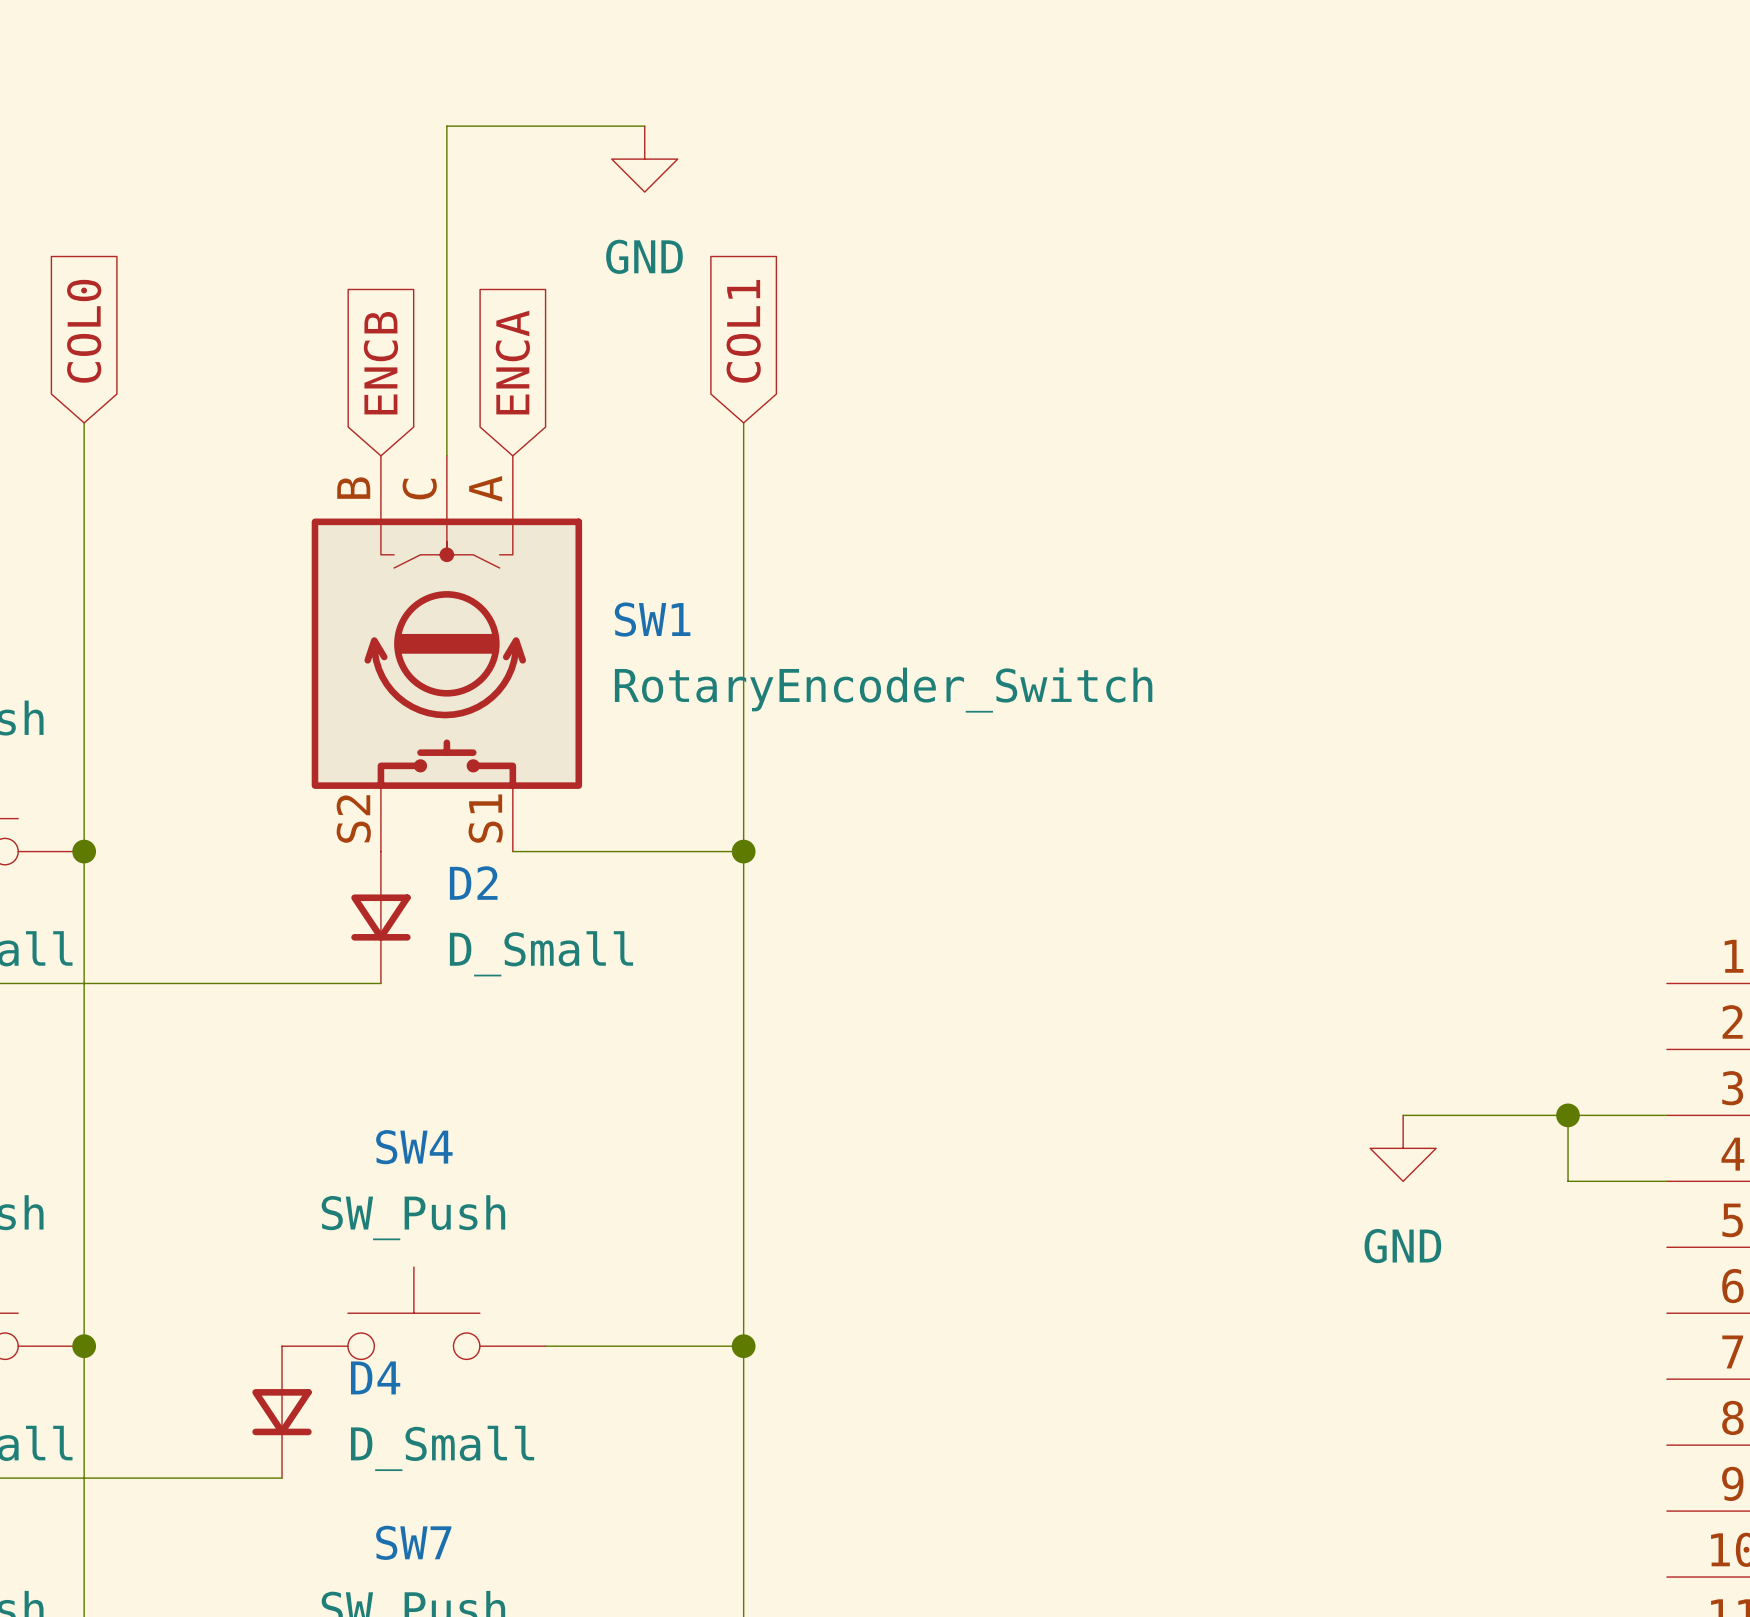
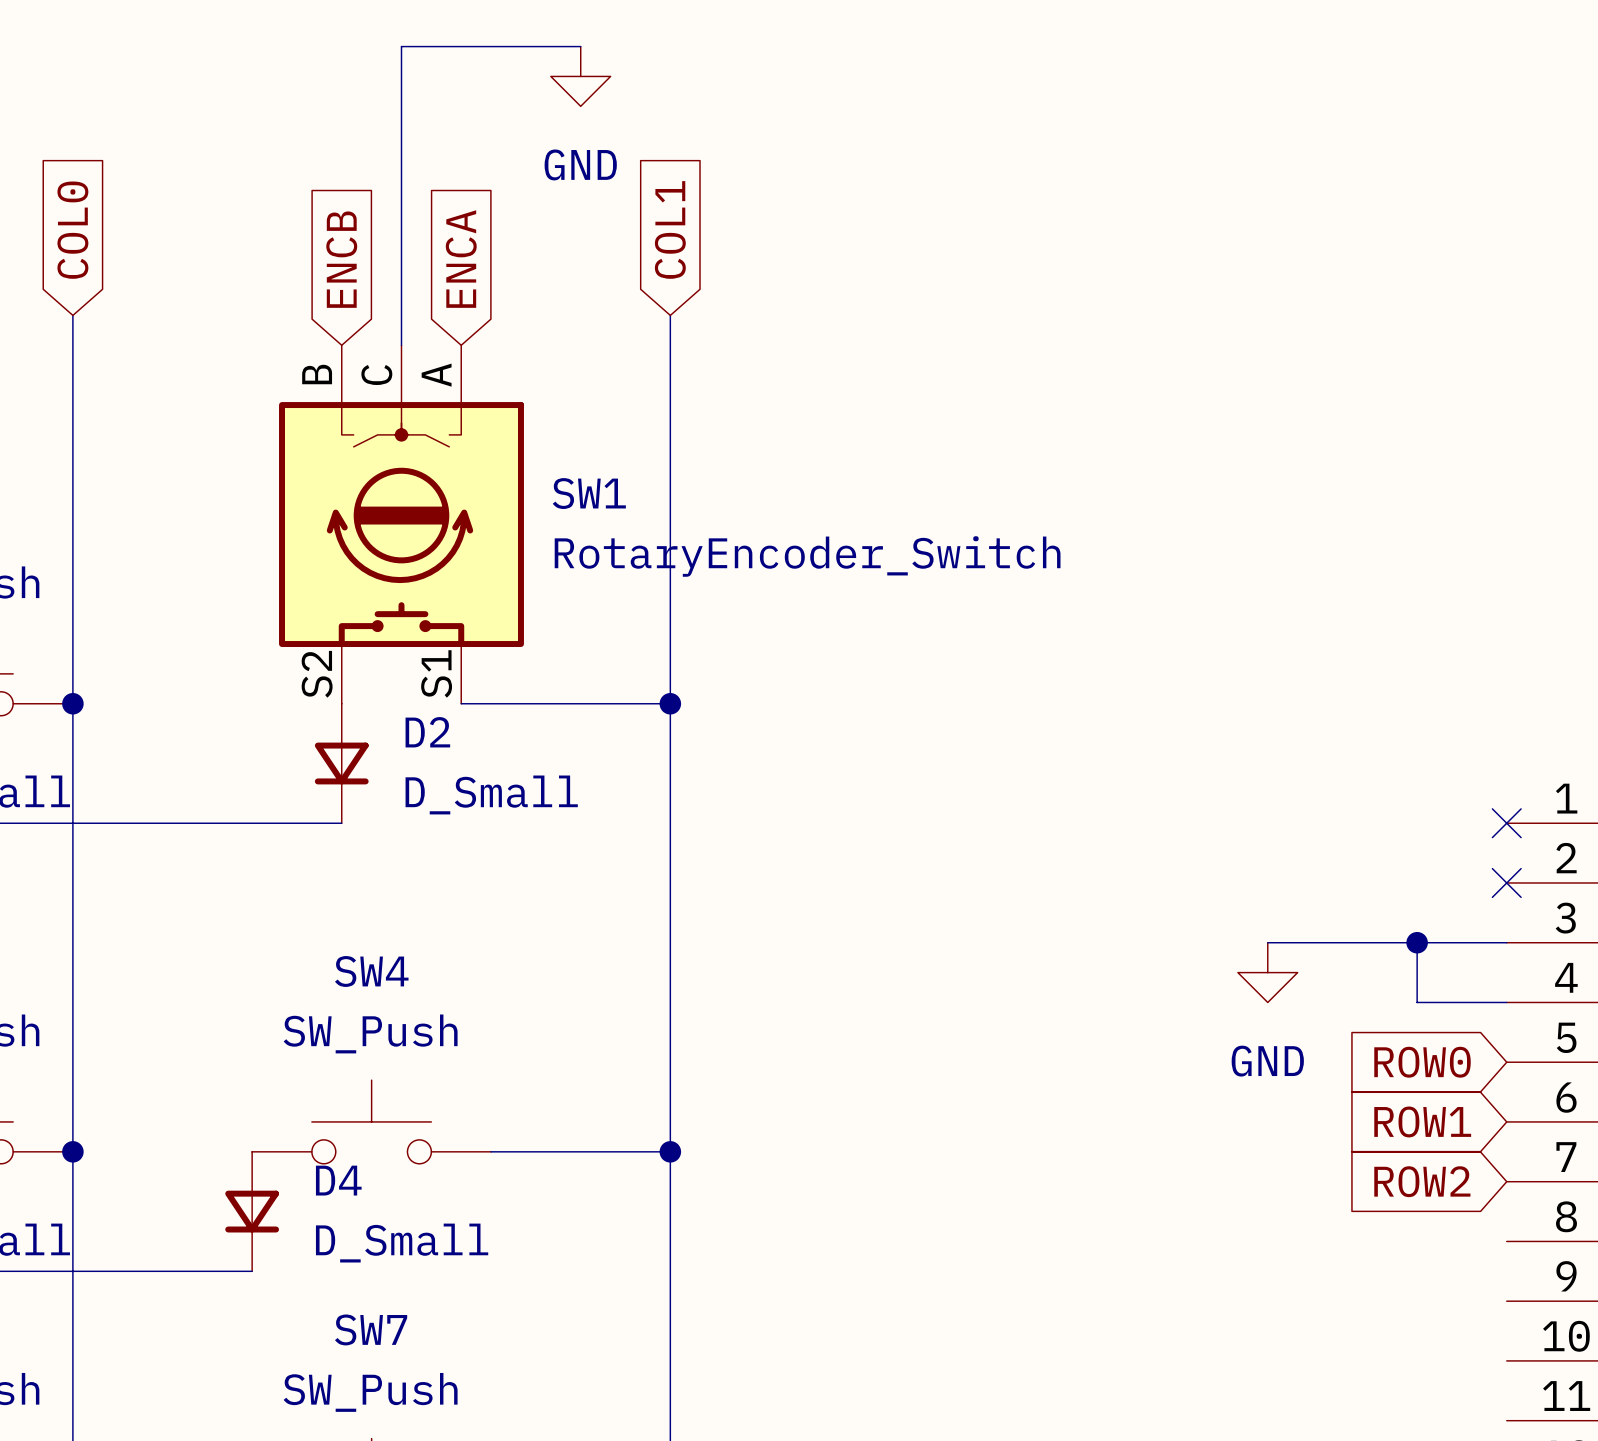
no-connect mark: none -> (1506, 823)
no-connect mark: none -> (1506, 882)
global label: none -> ROW0 (1422, 1062)
global label: none -> ROW1 (1422, 1121)
global label: none -> ROW2 (1422, 1181)

